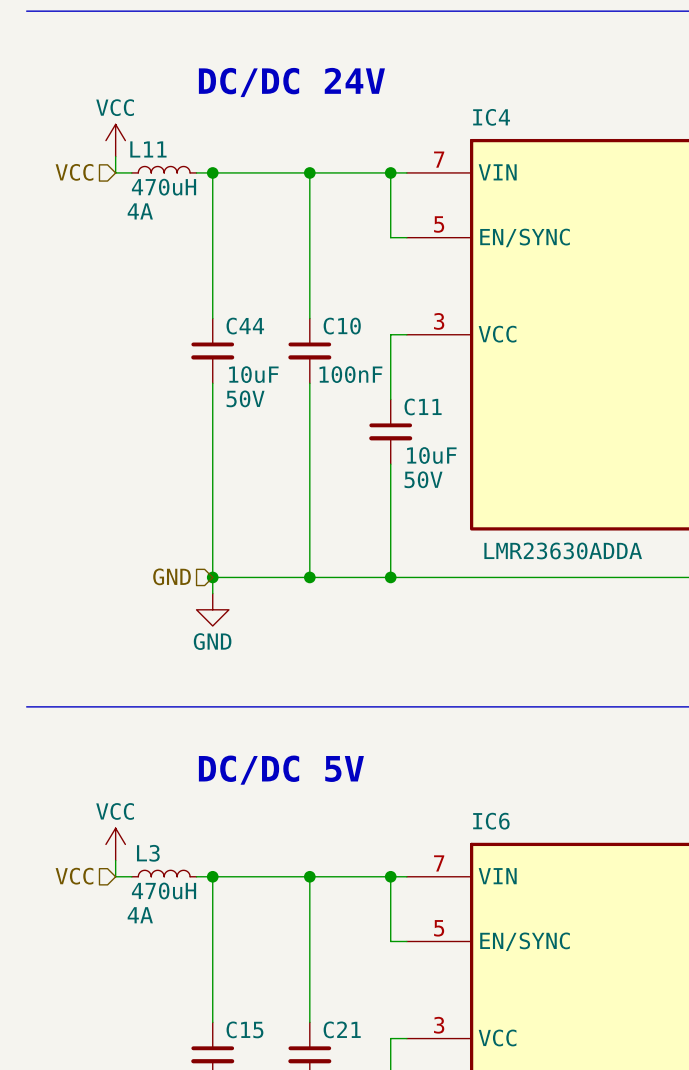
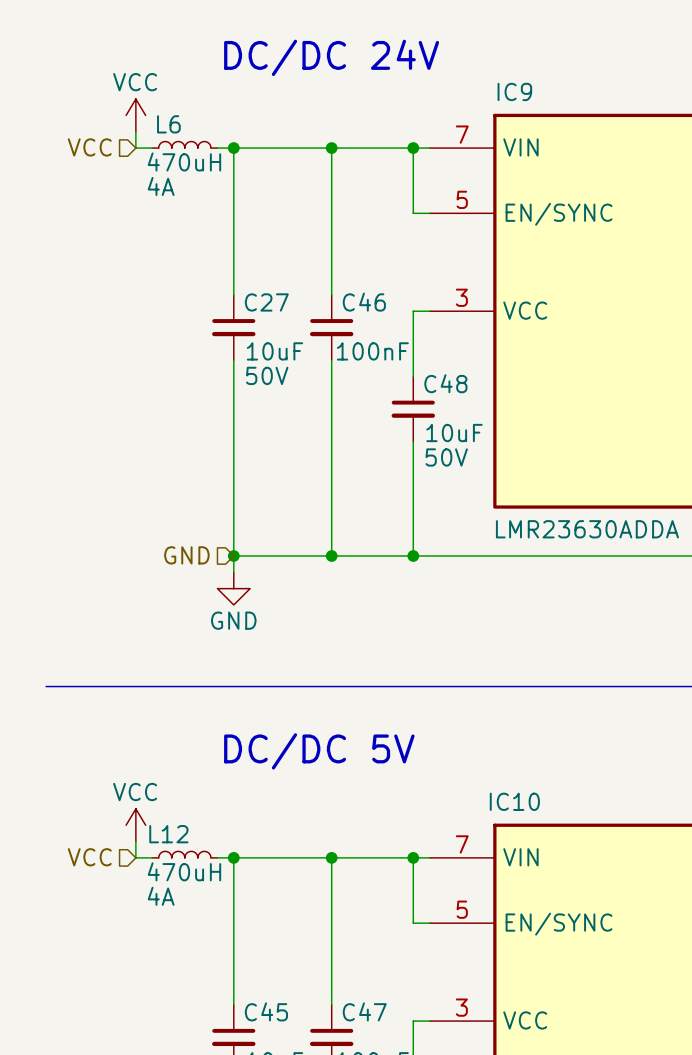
IC4 name: IC4 (491, 117) -> IC9 (514, 91)
L11 name: L11 (148, 149) -> L6 (168, 124)
C44 name: C44 (245, 326) -> C27 (266, 302)
C10 name: C10 (342, 326) -> C46 (364, 302)
C11 name: C11 (423, 406) -> C48 (445, 383)
IC6 name: IC6 (491, 821) -> IC10 (514, 801)
L3 name: L3 (148, 853) -> L12 (168, 834)
C15 name: C15 (244, 1029) -> C45 (266, 1011)
C21 name: C21 (342, 1029) -> C47 (364, 1011)

